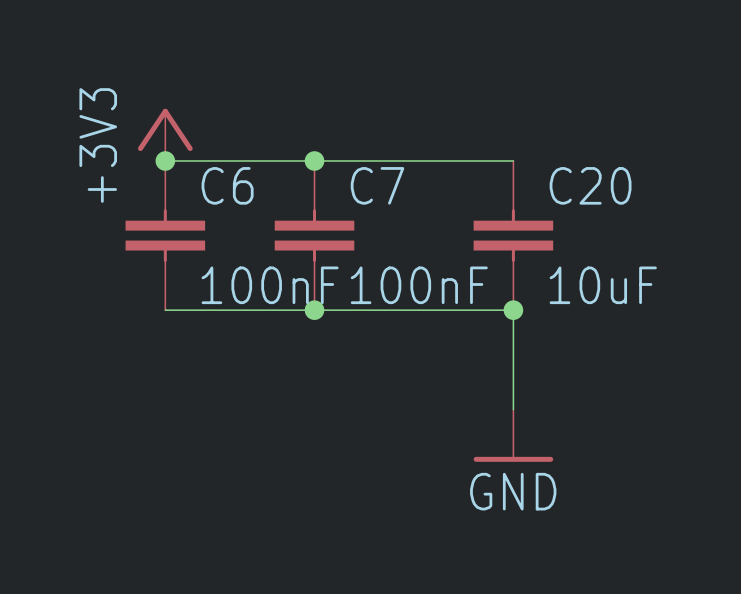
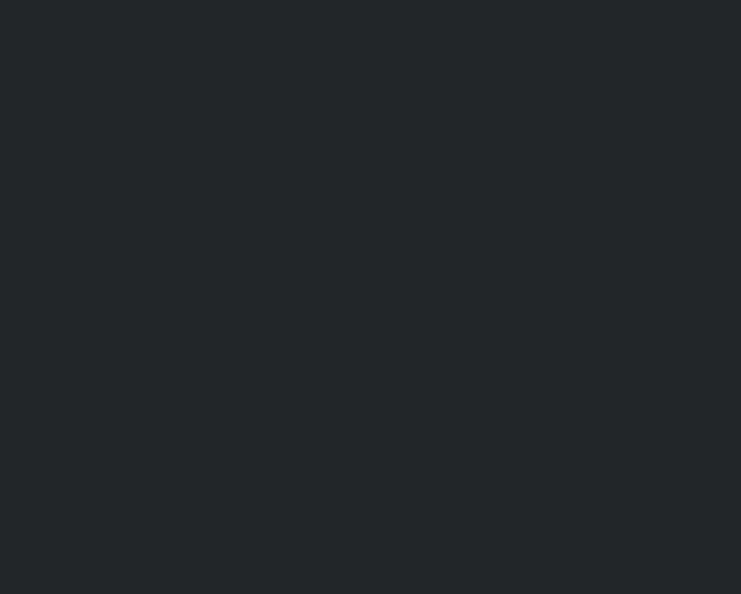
power symbol: +3V3 (165, 134) -> none
wire: (165, 160) (513, 160) -> none
junction: (165, 160) -> none
junction: (314, 160) -> none
C6: 100nF (165, 235) -> none
C7: 100nF (314, 235) -> none
C20: 10uF (513, 235) -> none
wire: (165, 310) (513, 310) (513, 409) -> none
junction: (314, 310) -> none
junction: (513, 310) -> none
power symbol: GND (513, 435) -> none

